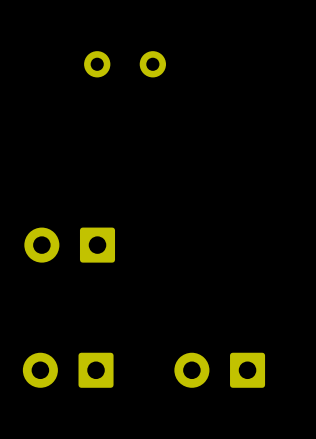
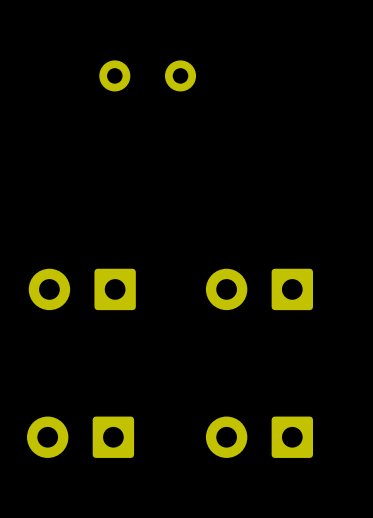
part: none -> (259, 289)

